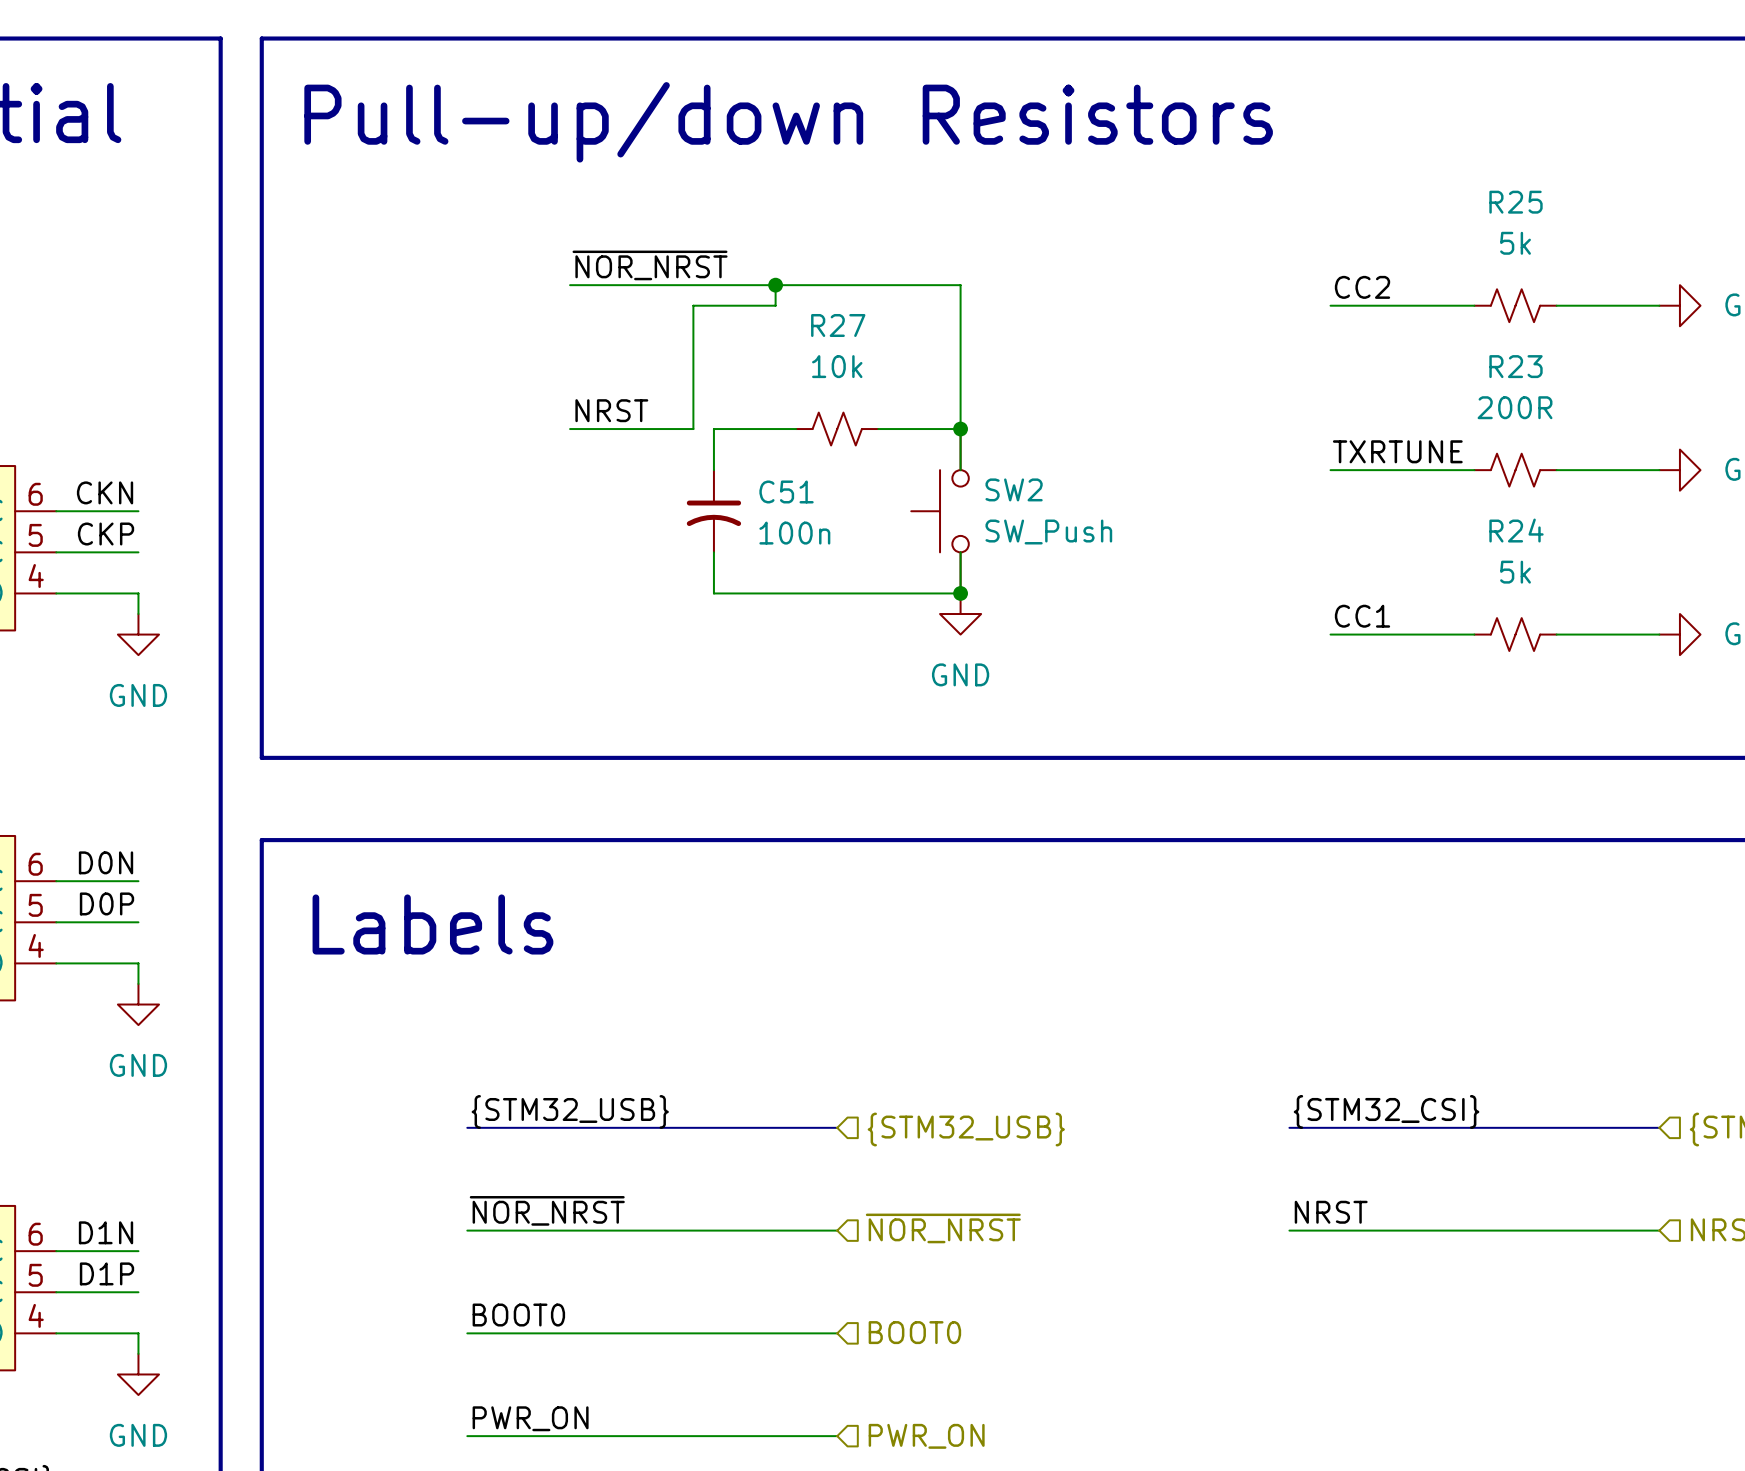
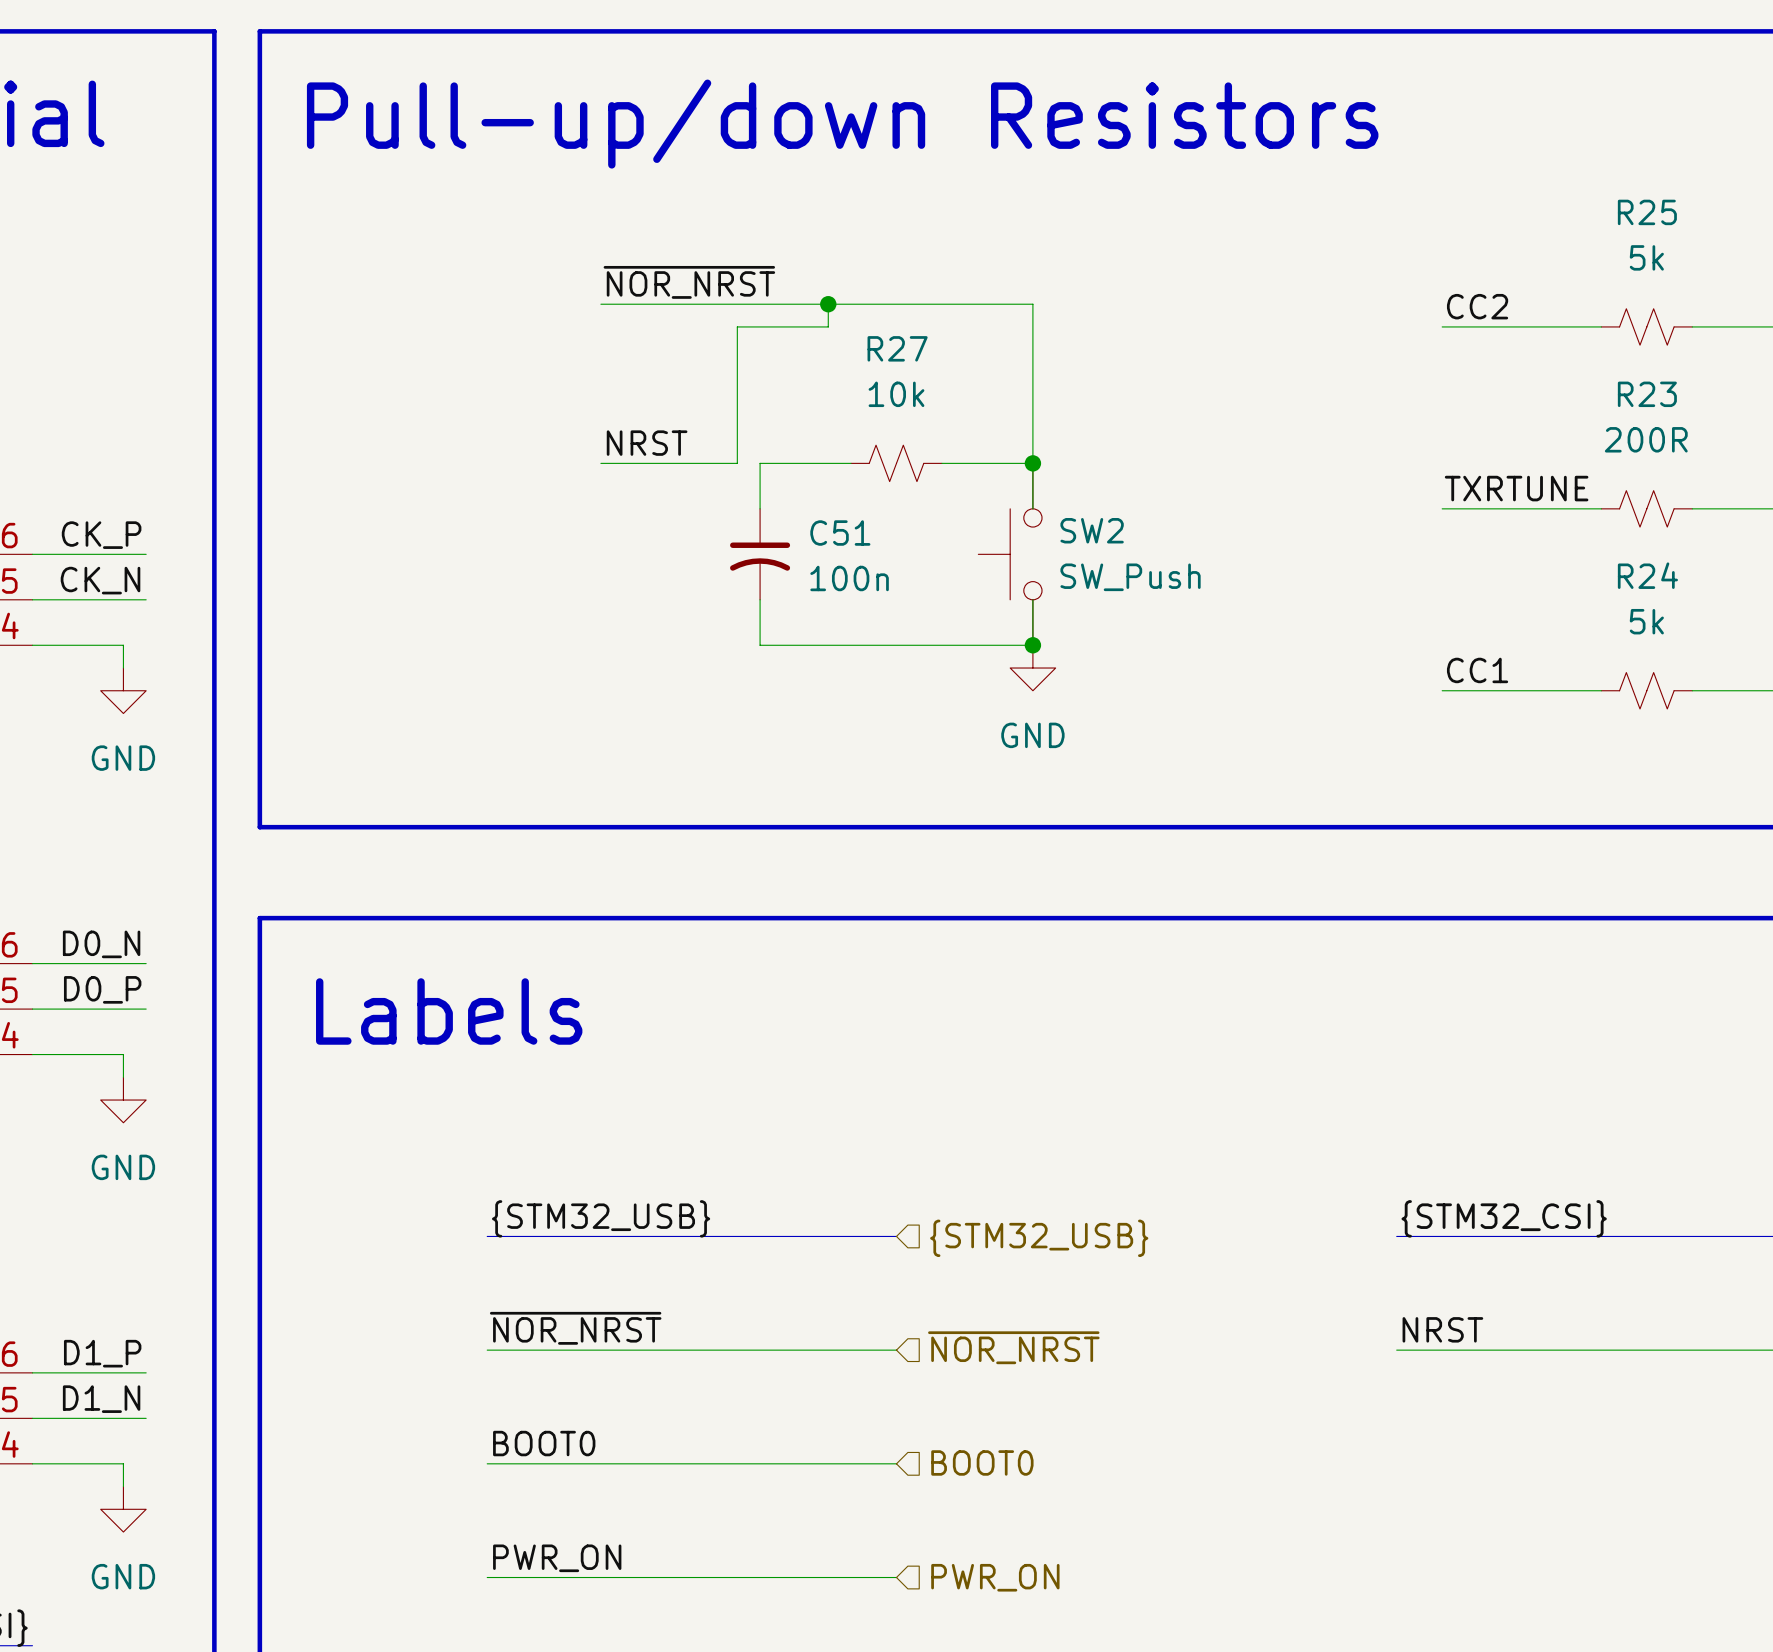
label: CKN (105, 492) -> CK_N (100, 580)
wire: none -> (123, 554) (146, 554)
label: CKP (106, 534) -> CK_P (101, 535)
wire: none -> (123, 599) (146, 599)
label: D0N (106, 862) -> D0_N (101, 944)
wire: none -> (123, 963) (146, 963)
label: D0P (106, 903) -> D0_P (102, 989)
wire: none -> (123, 1009) (146, 1009)
label: D1N (106, 1232) -> D1_N (101, 1399)
wire: none -> (123, 1372) (146, 1372)
label: D1P (106, 1273) -> D1_P (102, 1353)
wire: none -> (123, 1418) (146, 1418)

